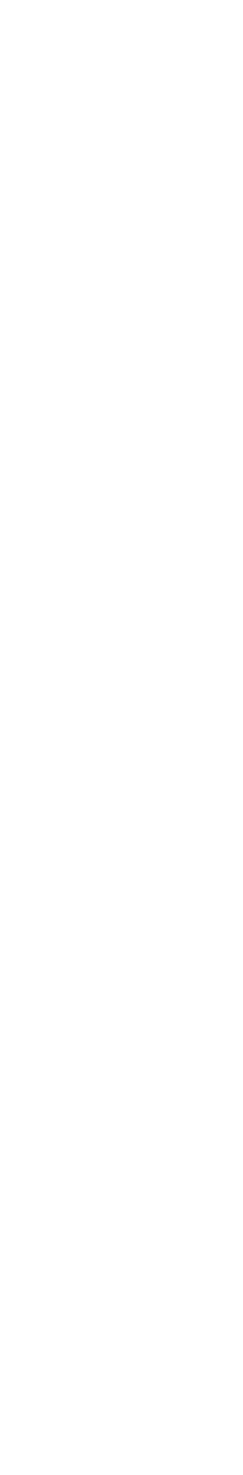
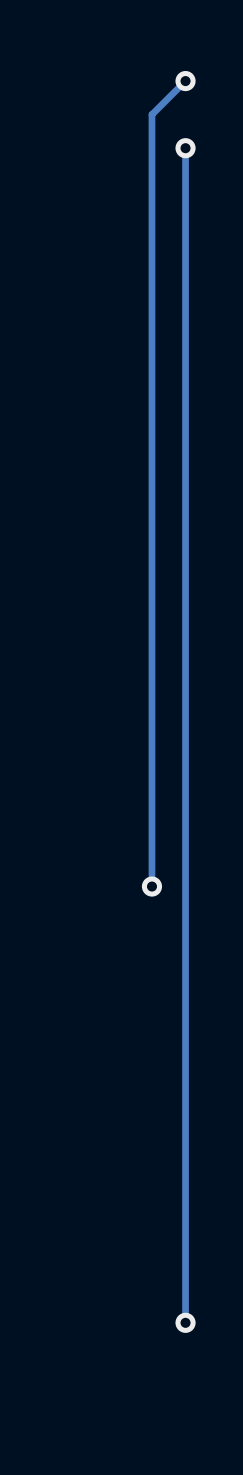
track: none -> (185, 81) (151, 114) (151, 886)
via: none -> (185, 81)
track: none -> (185, 148) (185, 1322)
via: none -> (185, 148)
via: none -> (151, 886)
via: none -> (185, 1322)

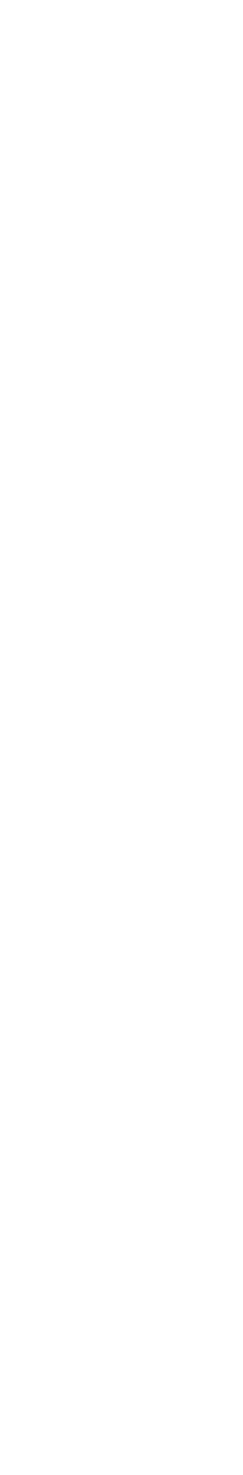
track: (185, 81) (151, 114) (151, 886) -> none
via: (185, 81) -> none
track: (185, 148) (185, 1322) -> none
via: (185, 148) -> none
via: (151, 886) -> none
via: (185, 1322) -> none

